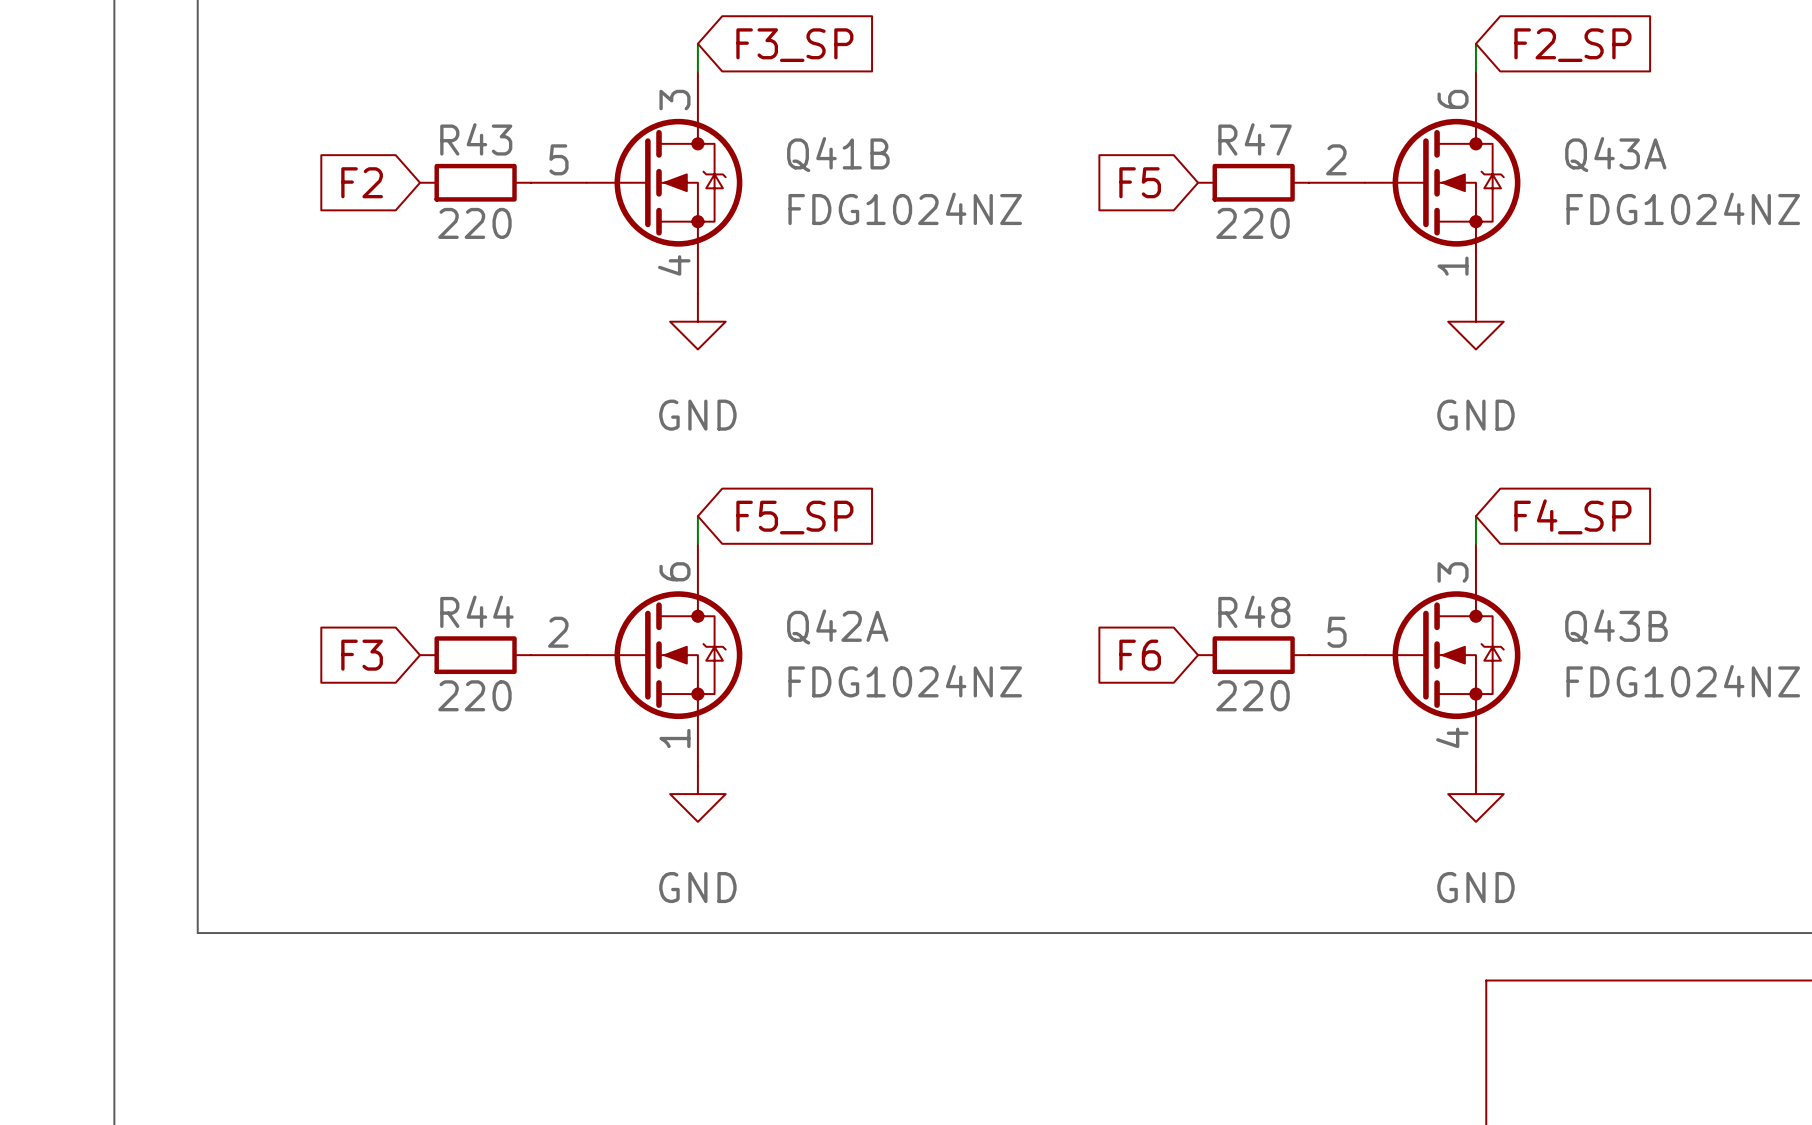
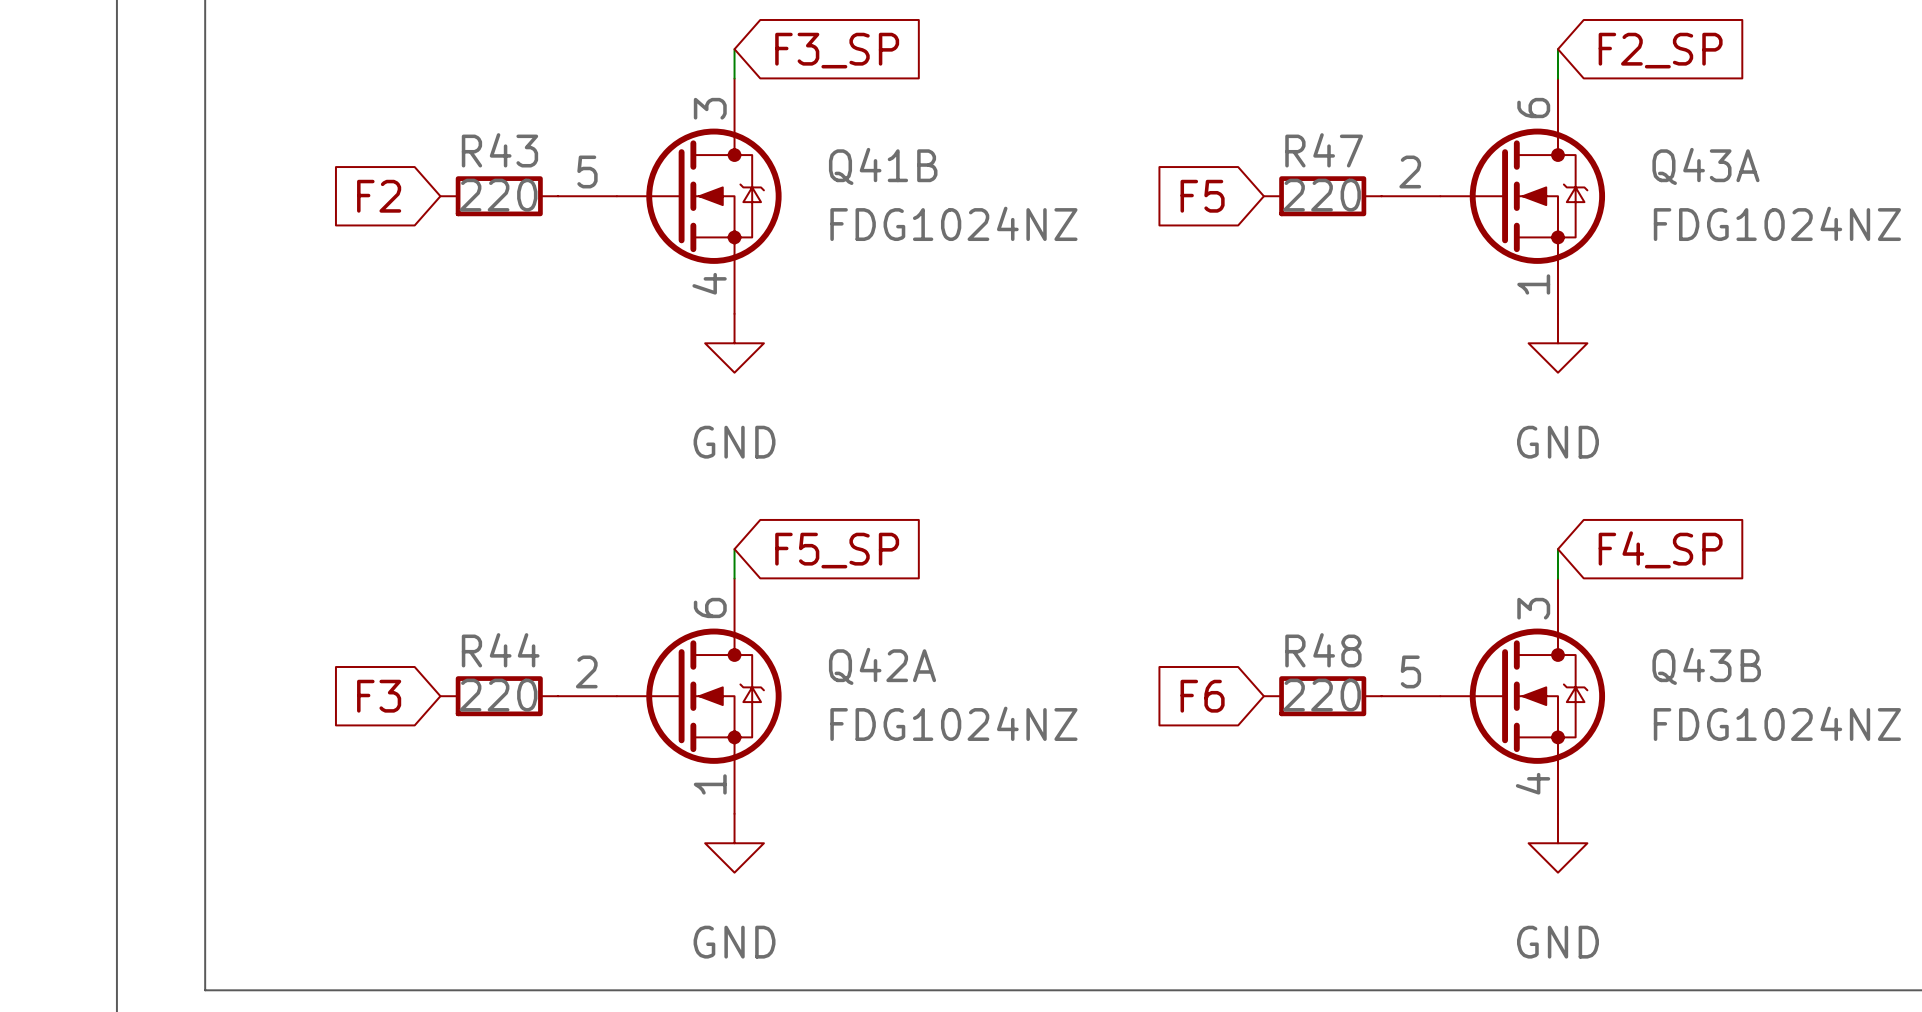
R43 value position: 220 (474, 223) -> 220 (498, 195)
R47 value position: 220 (1253, 223) -> 220 (1322, 195)
R44 value position: 220 (474, 695) -> 220 (498, 695)
R48 value position: 220 (1253, 695) -> 220 (1322, 695)

